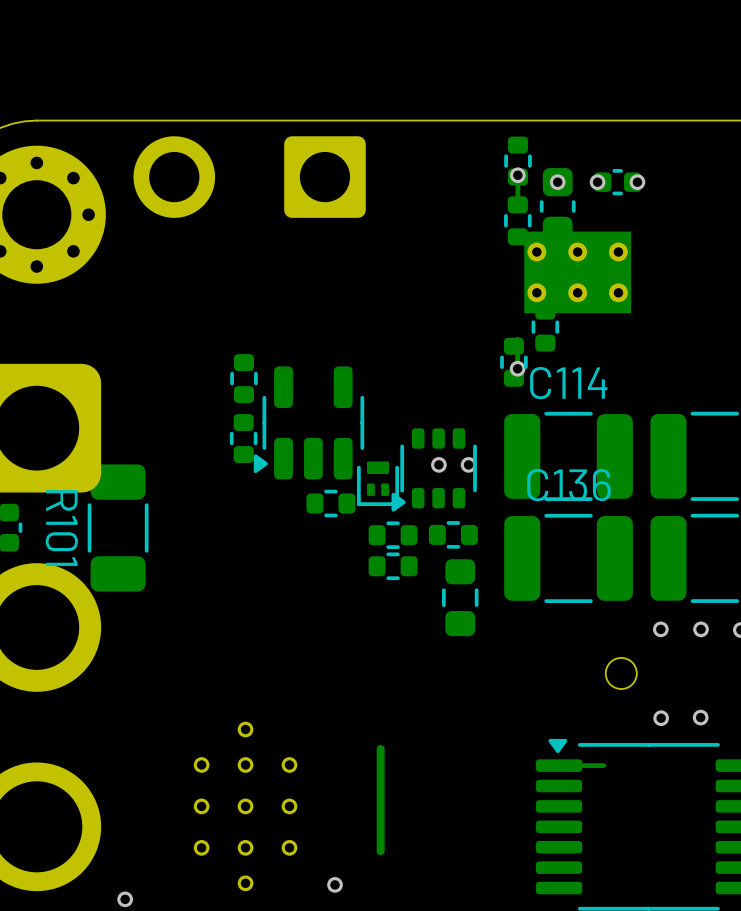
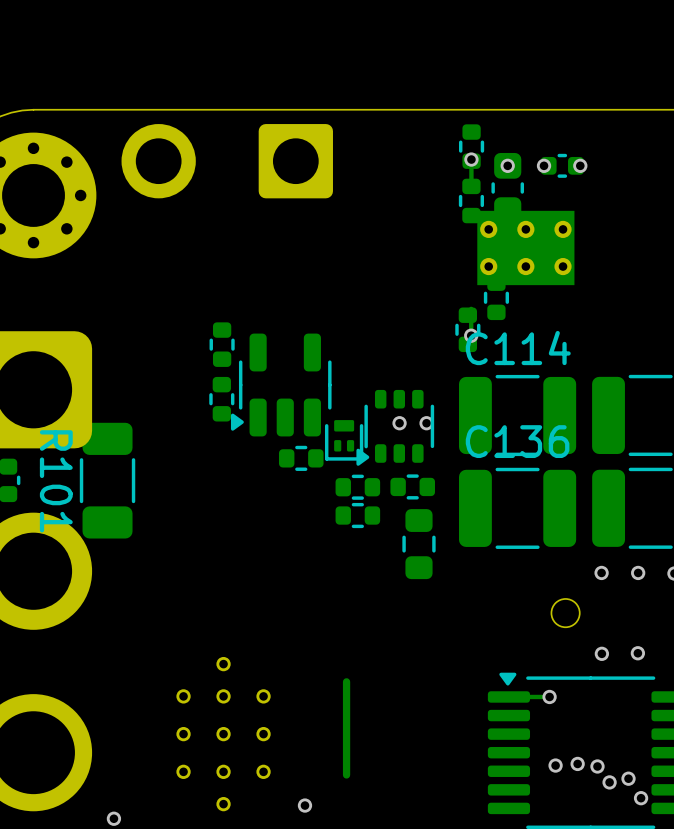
via: none -> (549, 696)
via: none -> (577, 763)
via: none -> (555, 765)
via: none -> (597, 766)
via: none -> (628, 778)
via: none -> (609, 782)
via: none -> (641, 798)

